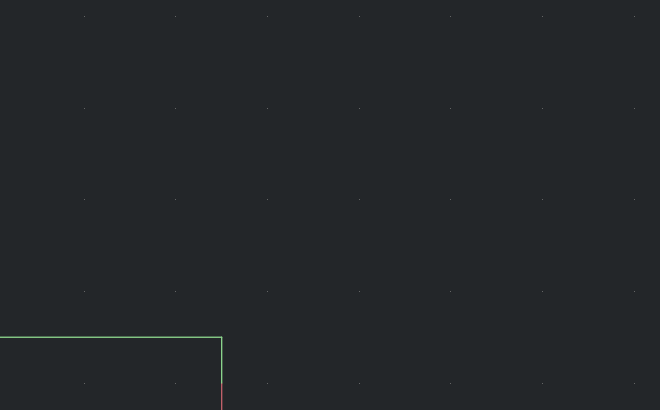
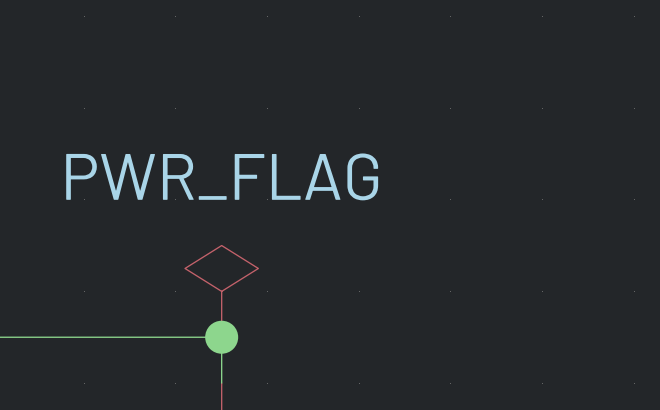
power symbol: none -> PWR_FLAG (221, 291)
junction: none -> (221, 337)

